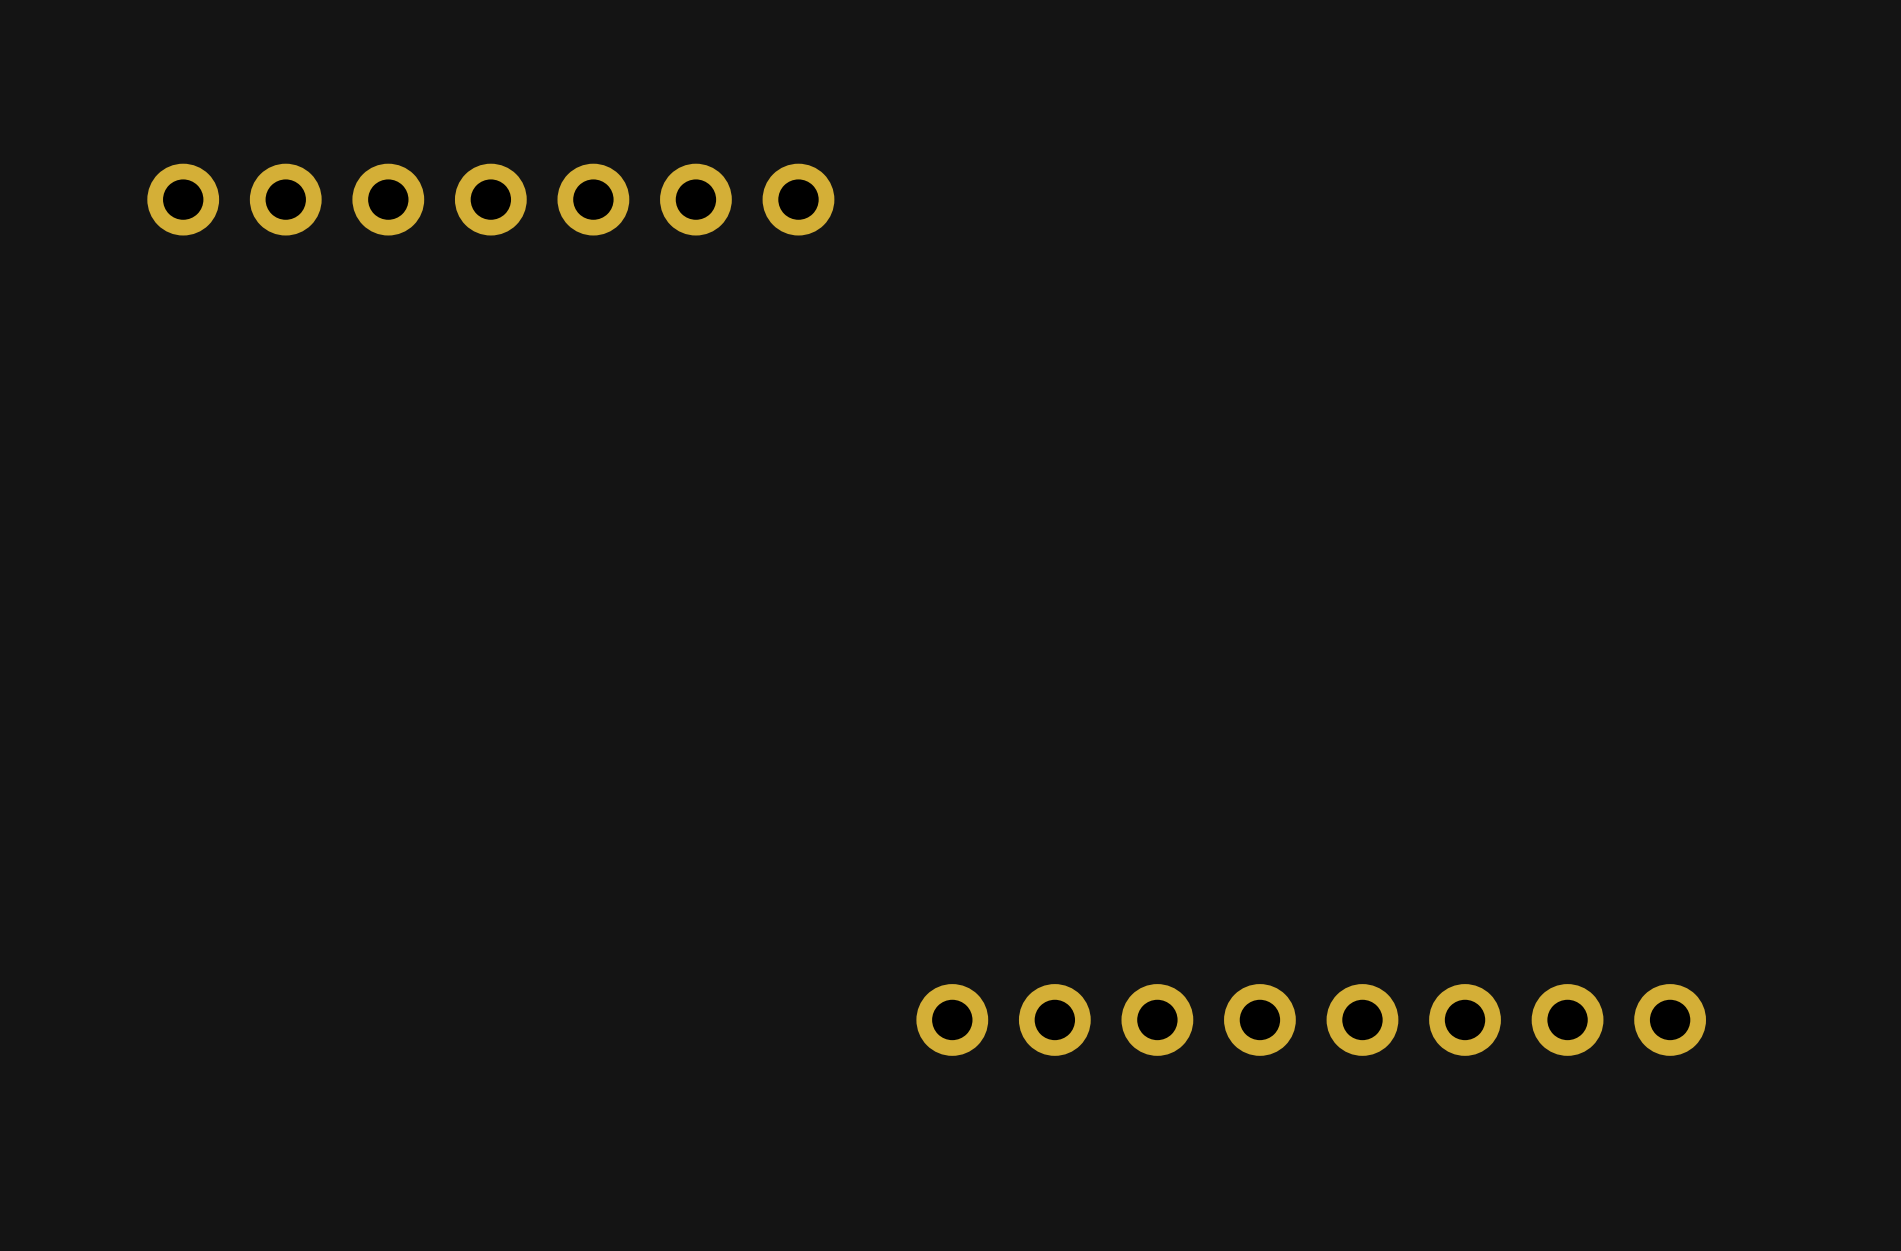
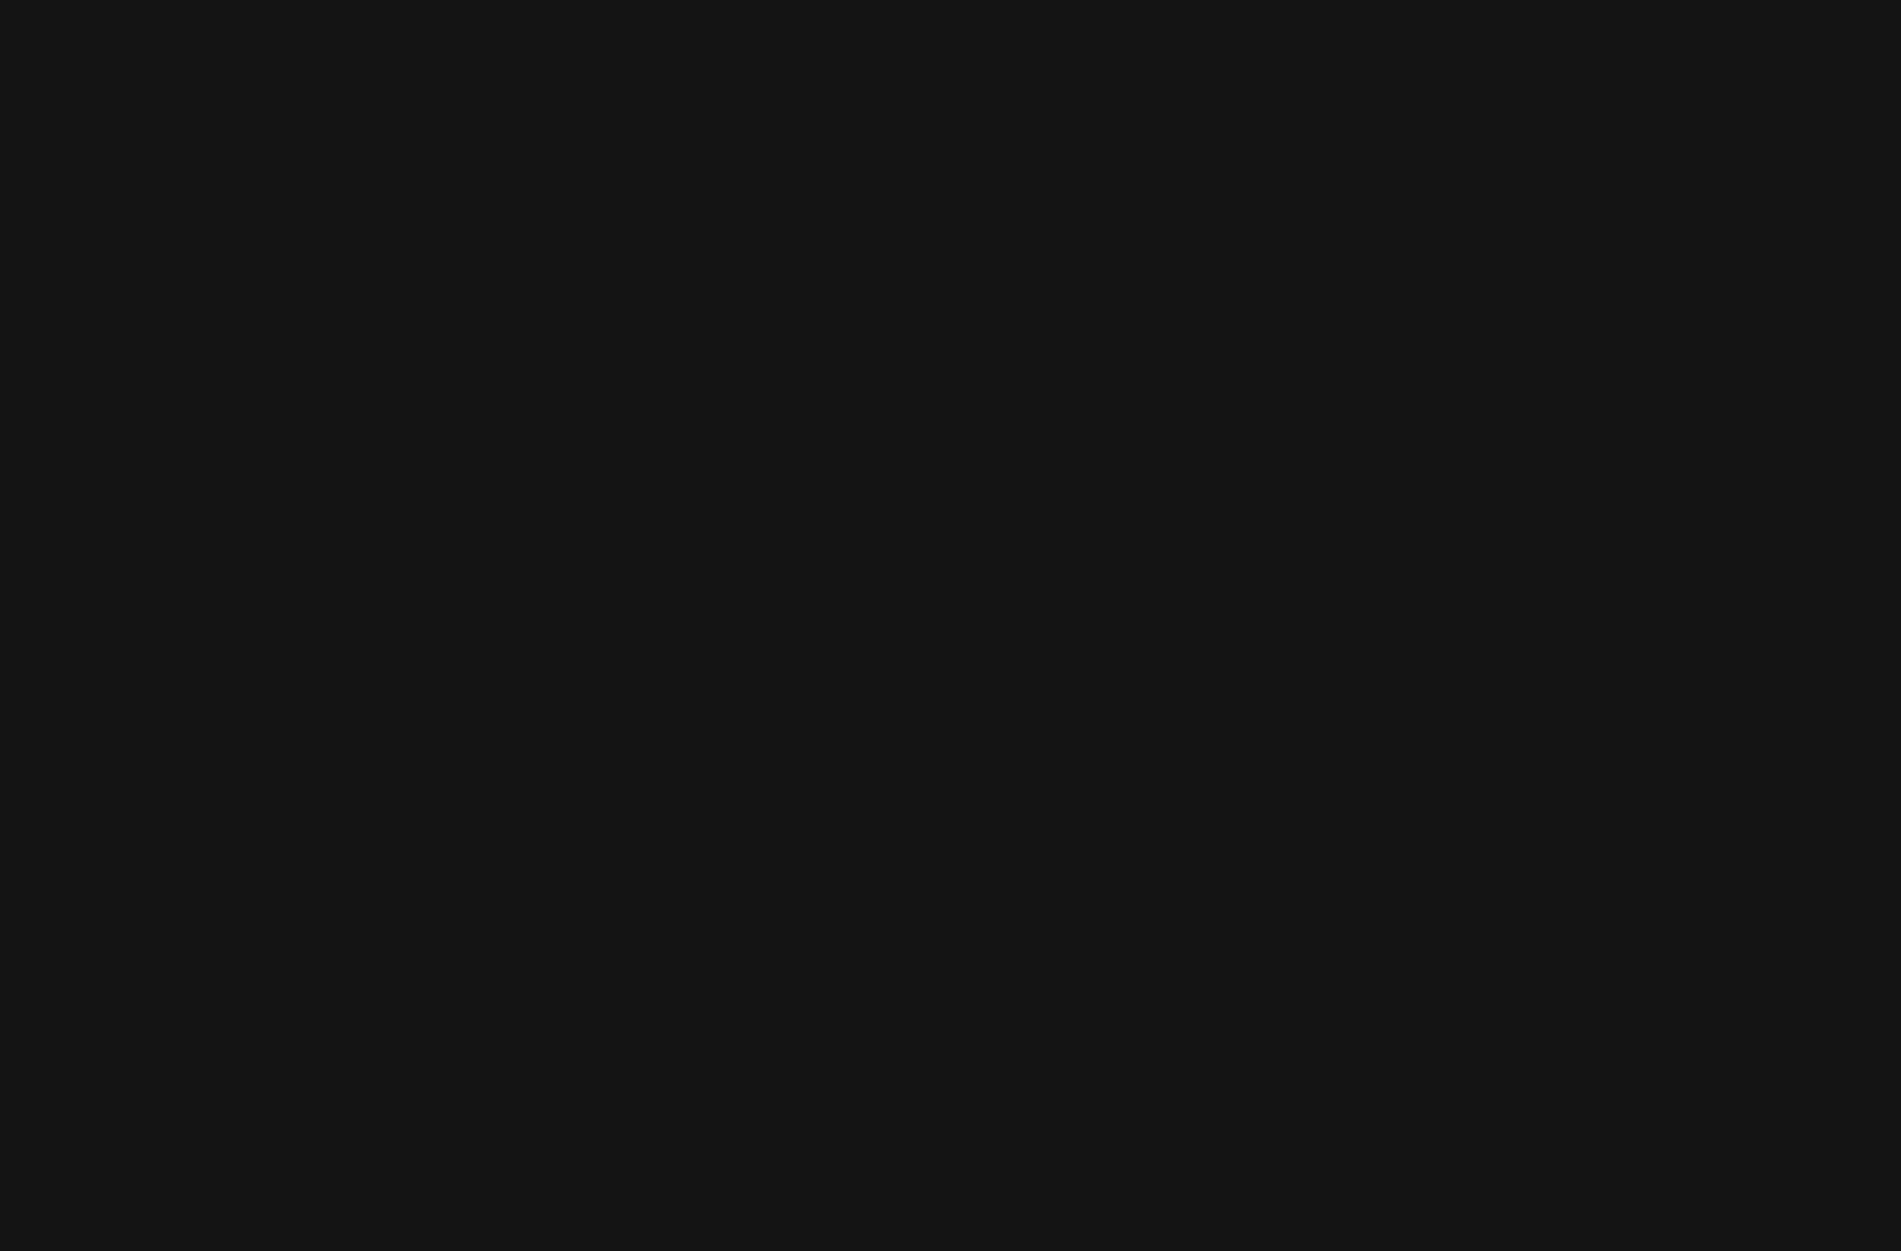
part: (490, 199) -> none
part: (1311, 1019) -> none

